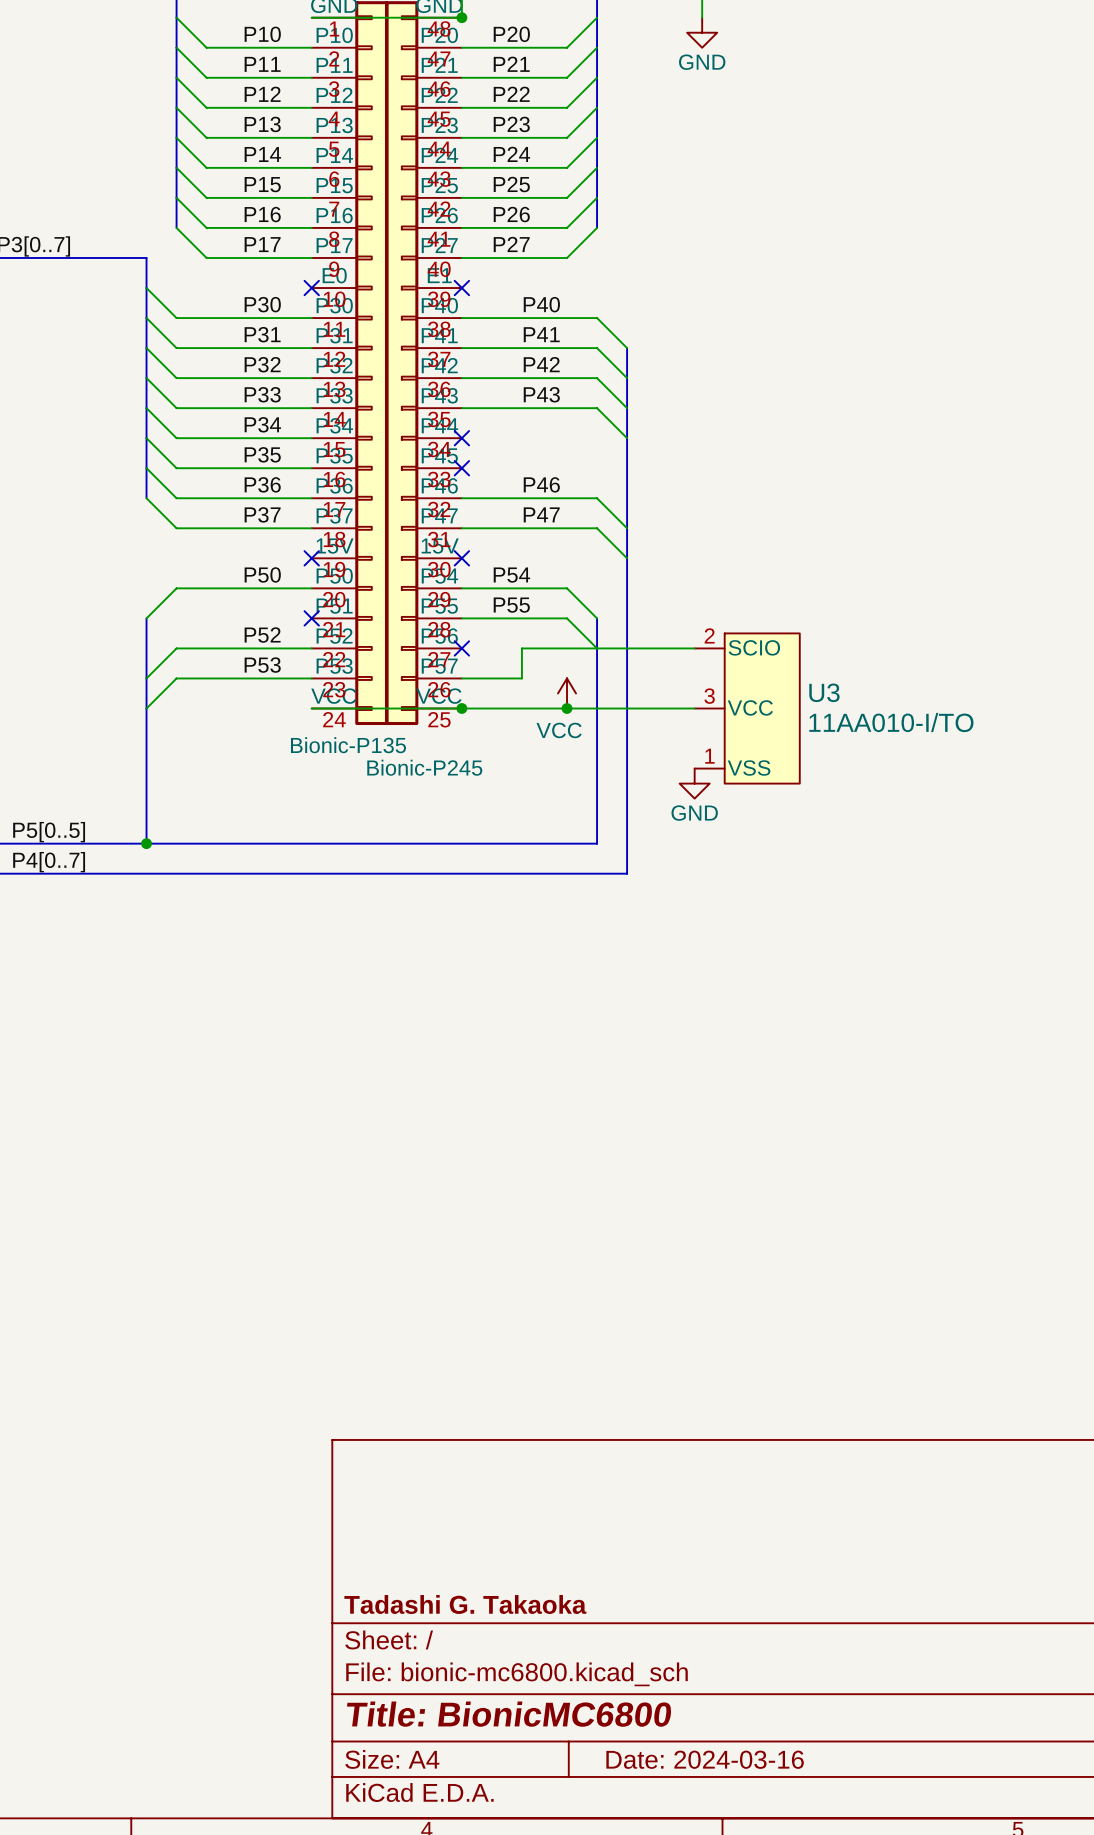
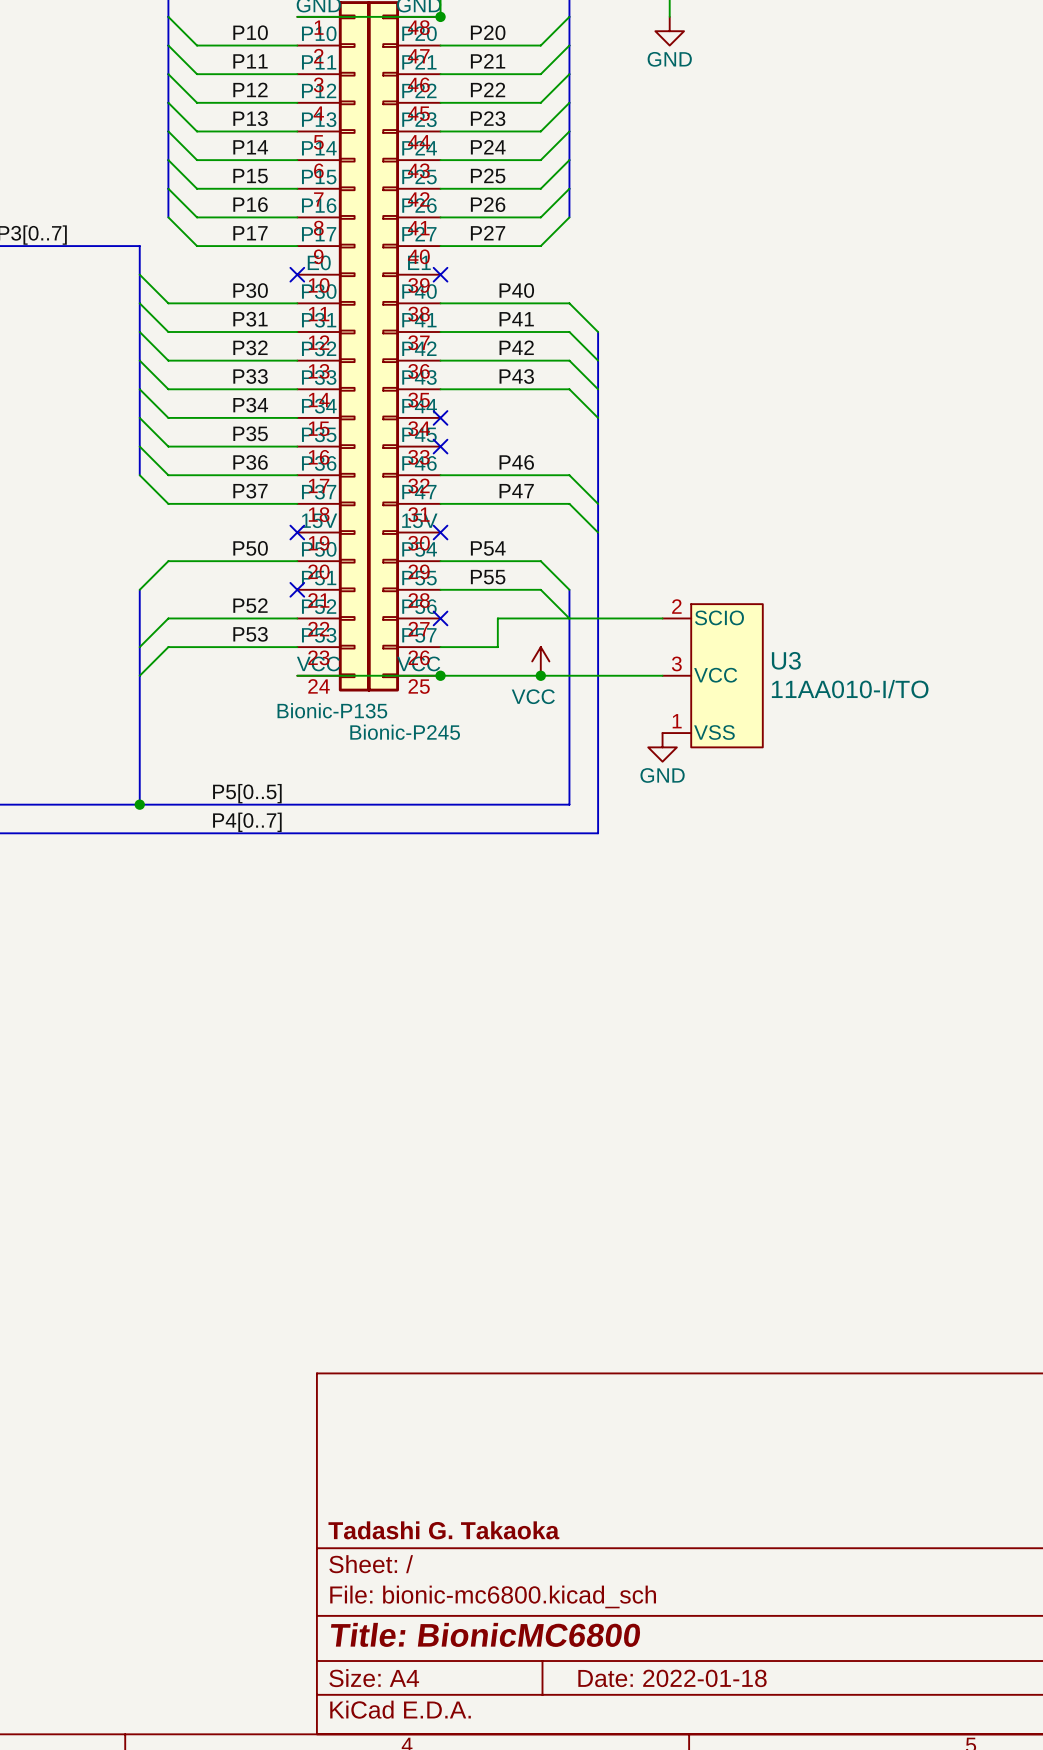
label position: P5[0..5] (49, 832) -> P5[0..5] (247, 793)
label position: P4[0..7] (49, 862) -> P4[0..7] (247, 822)
title block: Date: 2024-03-16 (705, 1759) -> Date: 2022-01-18 (672, 1678)

